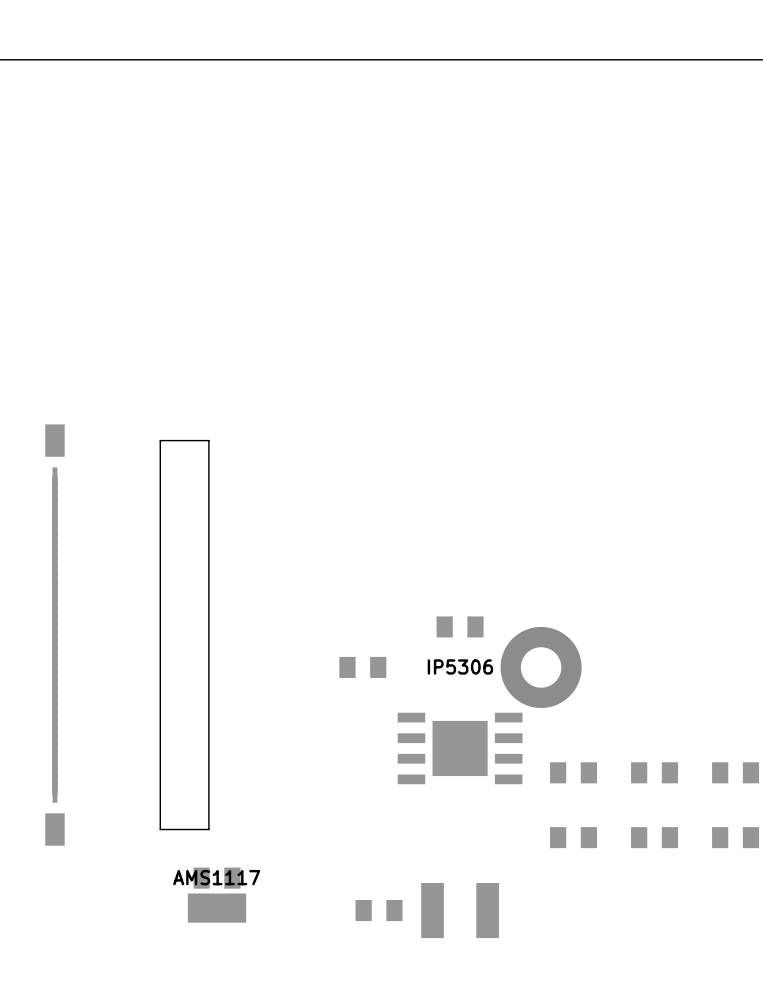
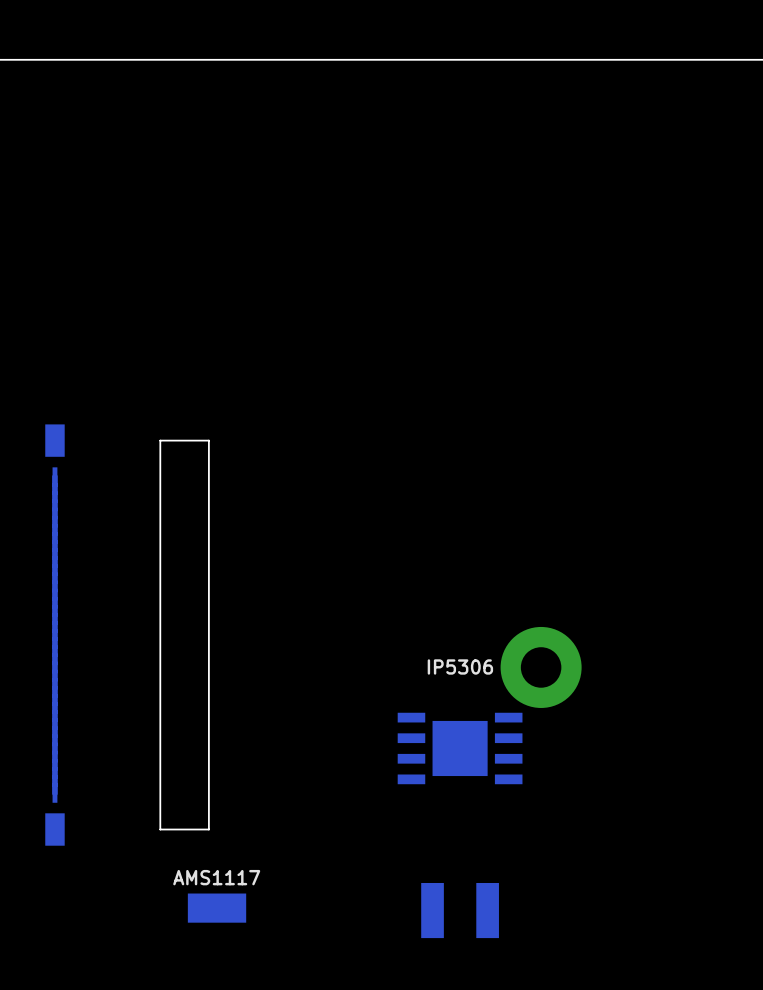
part: (460, 626) -> none
part: (362, 667) -> none
part: (573, 772) -> none
part: (654, 772) -> none
part: (735, 772) -> none
part: (573, 837) -> none
part: (654, 837) -> none
part: (735, 837) -> none
part: (217, 878) -> none
part: (379, 910) -> none

